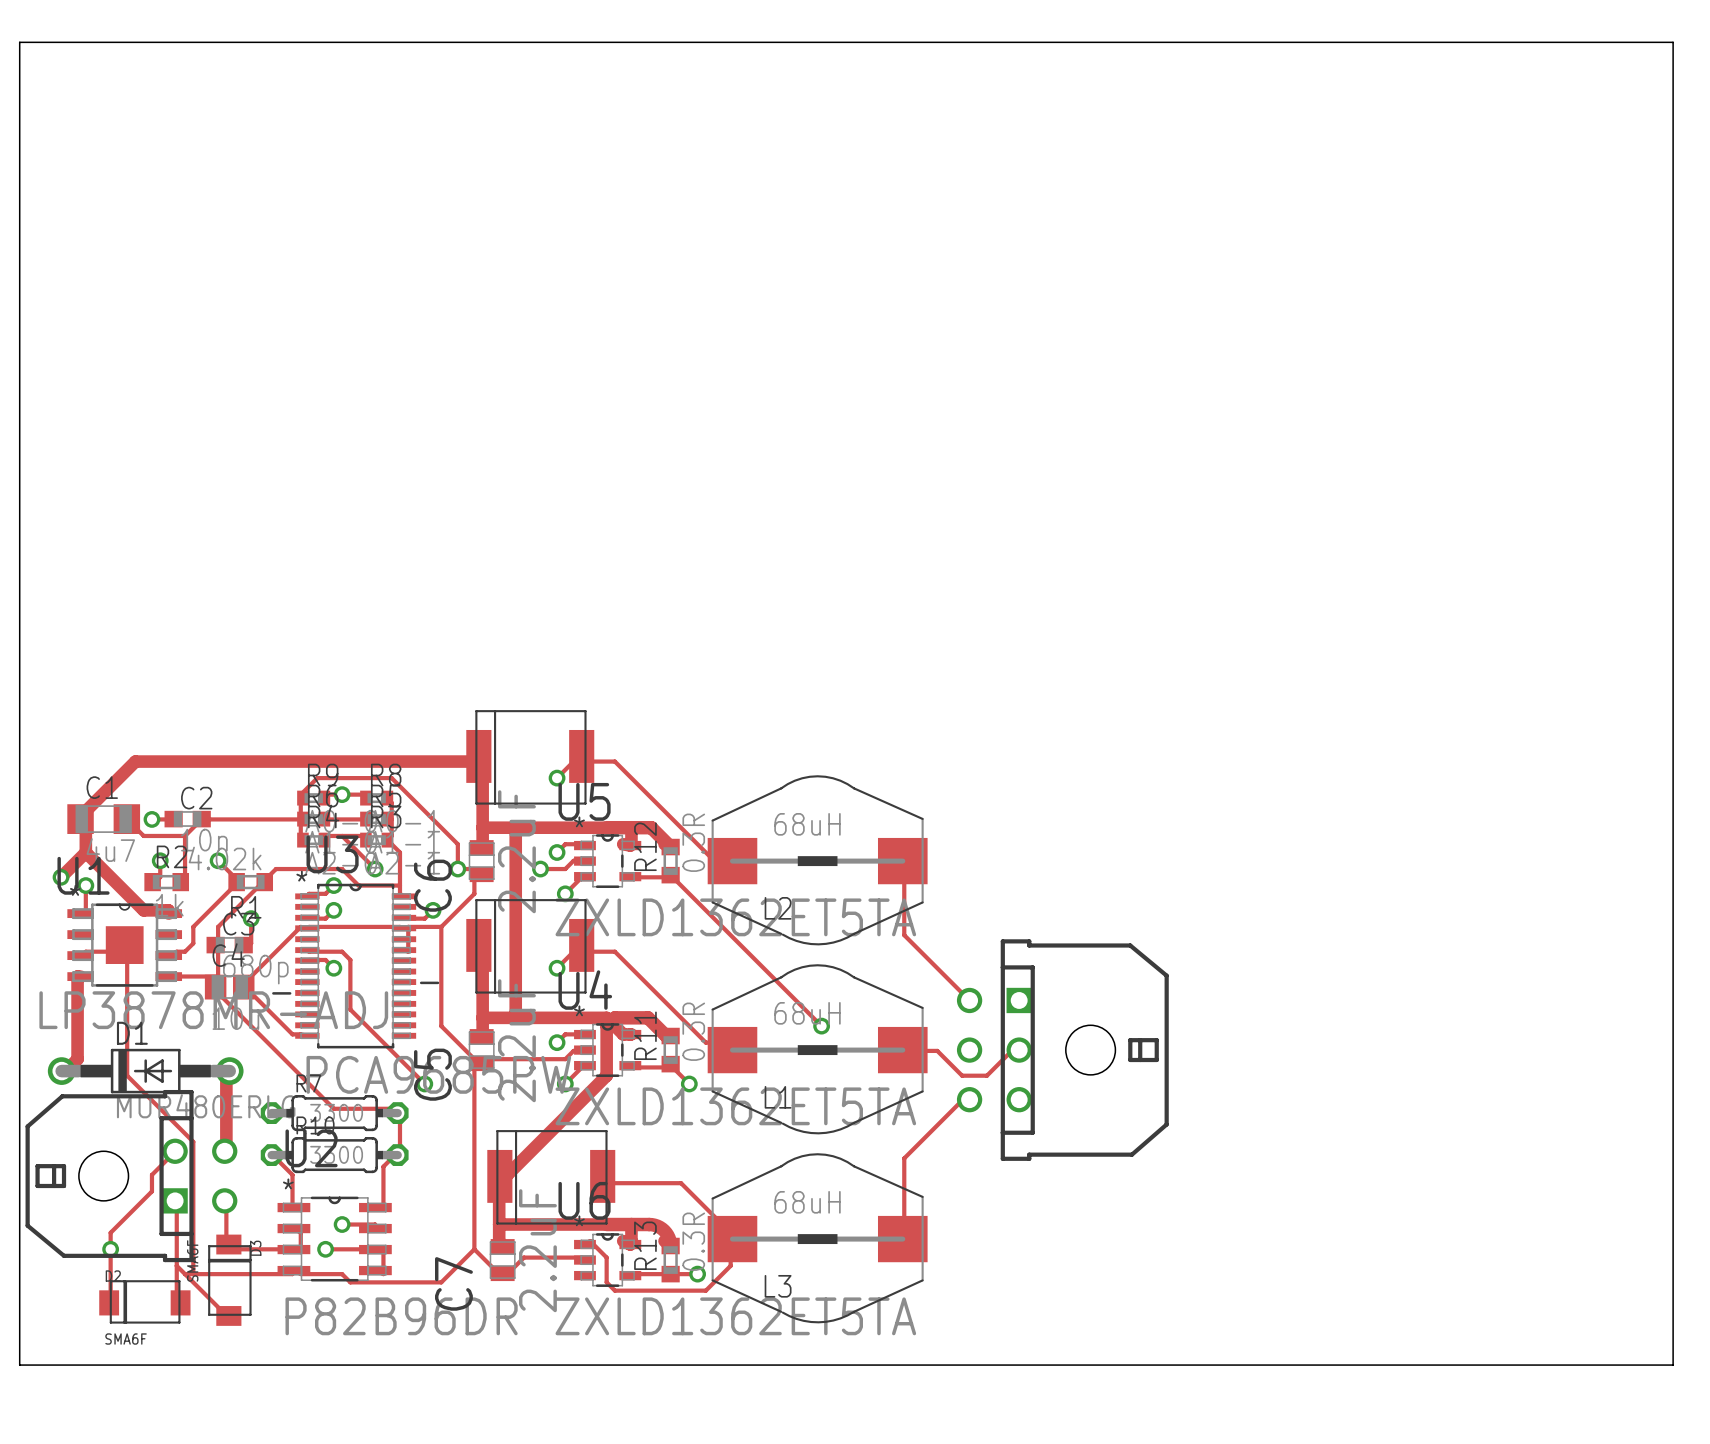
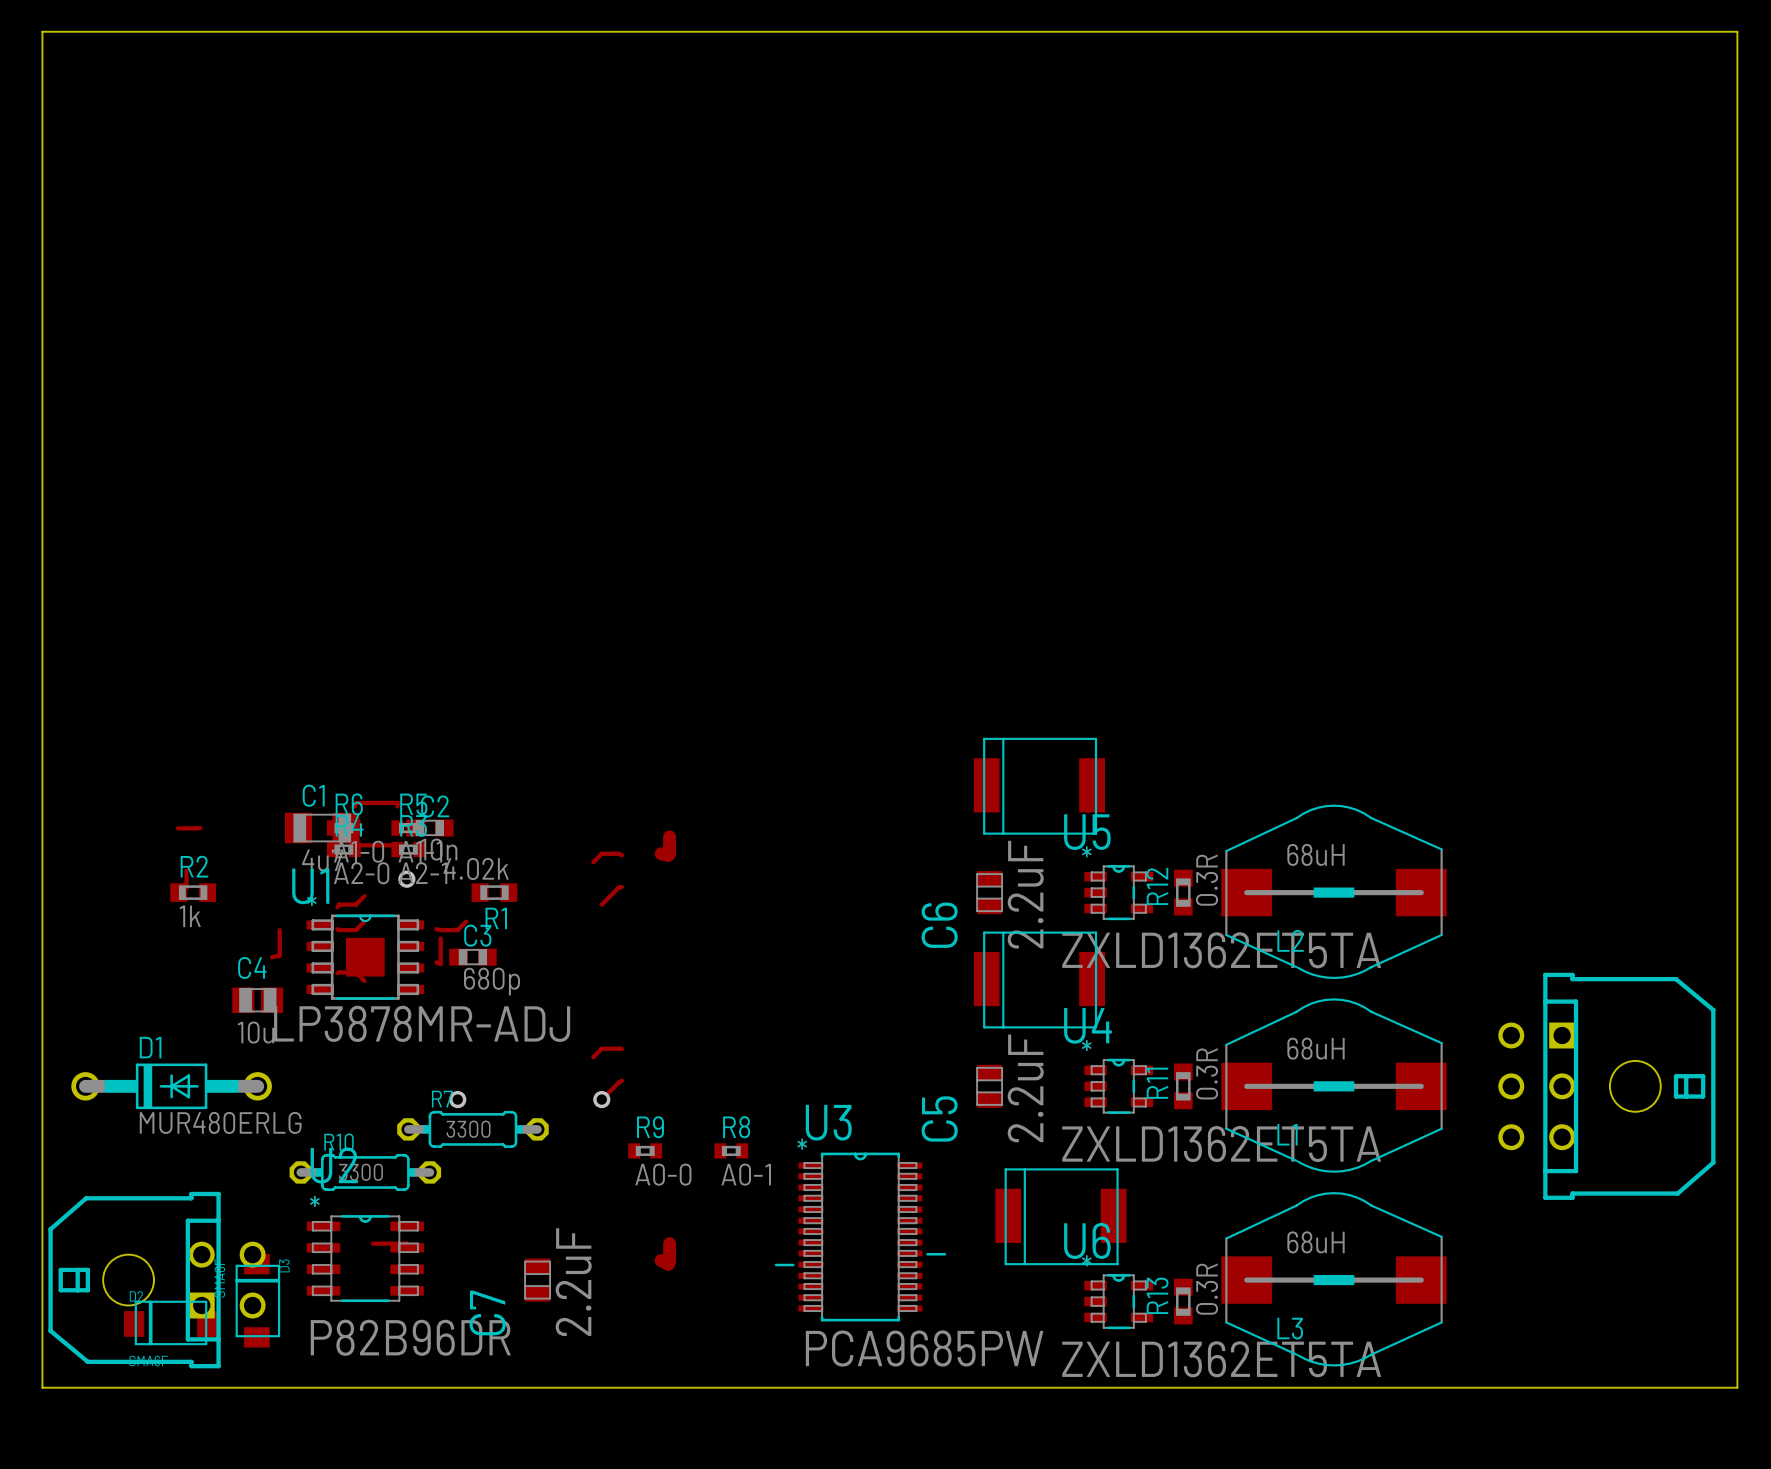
part: (530, 757) -> none
track: (557, 778) (573, 761) (581, 756) (581, 761) (614, 761) (714, 860) (732, 861) -> none
via: (557, 778) -> none
part: none -> (1039, 786)
via: (342, 794) -> none
R9 position: (313, 798) -> (645, 1150)
R8 position: (376, 798) -> (731, 1150)
track: (387, 798) (391, 802) (391, 835) (387, 840) (399, 852) (399, 893) (403, 896) -> none
C1 position: (103, 819) -> (322, 828)
track: (126, 819) (143, 835) (185, 835) -> none
via: (151, 819) -> none
C2 position: (187, 819) -> (429, 828)
track: (302, 819) (201, 819) (185, 835) -> none
track: (324, 819) (365, 819) -> none
track: (482, 827) (651, 827) (670, 847) (664, 844) -> none
track: (515, 827) (515, 1017) -> none
track: (185, 835) (185, 877) (180, 882) -> none
track: (342, 835) (375, 869) -> none
track: (302, 840) (300, 835) (300, 802) (302, 798) (300, 794) (317, 778) (391, 778) (457, 844) (457, 869) (474, 869) (481, 874) (474, 877) (474, 893) (441, 926) -> none
track: (481, 847) (482, 761) (478, 756) (474, 761) (135, 761) (85, 811) (80, 819) (85, 819) (85, 852) -> none
track: (85, 852) (143, 910) (168, 910) (168, 913) -> none
track: (85, 852) (61, 877) -> none
via: (557, 852) -> none
via: (160, 860) -> none
track: (218, 860) (234, 877) (236, 882) (193, 926) (193, 943) (185, 951) (176, 951) (168, 955) -> none
via: (218, 860) -> none
L2 position: (817, 860) -> (1334, 891)
C6 position: (481, 861) -> (989, 892)
track: (584, 861) (573, 860) (565, 869) (540, 869) -> none
U5 position: (607, 861) -> (1118, 892)
R12 position: (670, 861) -> (1183, 892)
track: (902, 861) (904, 935) (969, 1000) -> none
via: (457, 869) -> none
via: (540, 869) -> none
track: (630, 876) (664, 877) (670, 875) (821, 1026) -> none
via: (61, 877) -> none
R1 position: (250, 882) -> (494, 892)
track: (85, 885) (85, 910) (80, 913) -> none
via: (85, 885) -> none
via: (333, 885) -> none
track: (399, 885) (358, 885) (342, 869) (275, 869) (218, 926) (218, 943) (215, 945) (218, 951) (218, 984) (215, 987) -> none
via: (565, 893) -> none
via: (333, 910) -> none
via: (433, 910) -> none
via: (251, 918) -> none
track: (441, 926) (300, 926) (242, 984) (292, 1034) (307, 1035) -> none
track: (441, 926) (441, 1026) (474, 1059) (481, 1063) -> none
U1 position: (124, 945) -> (365, 957)
C3 position: (229, 945) -> (472, 957)
track: (478, 945) (482, 951) (481, 1036) -> none
part: (530, 946) -> none
track: (307, 950) (342, 951) (350, 959) (350, 1009) (424, 1083) -> none
track: (80, 955) (85, 951) (118, 951) (124, 945) (127, 951) (127, 1075) (193, 1141) (193, 1274) -> none
U3 position: (355, 966) -> (860, 1237)
part: none -> (1039, 979)
via: (333, 968) -> none
track: (557, 968) (581, 945) (581, 951) (614, 951) (705, 1042) (730, 1042) (732, 1050) -> none
via: (557, 968) -> none
track: (80, 976) (77, 976) (77, 1059) (69, 1067) (61, 1071) -> none
track: (168, 976) (218, 976) (215, 987) -> none
track: (215, 987) (218, 993) (333, 1108) (391, 1108) (397, 1113) (399, 1117) (399, 1150) (397, 1155) (383, 1166) (383, 1207) (375, 1207) -> none
track: (482, 1017) (606, 1017) (623, 1034) (631, 1034) -> none
via: (821, 1026) -> none
track: (664, 1034) (670, 1036) (666, 1036) (647, 1017) (614, 1017) (606, 1026) (606, 1075) (507, 1174) (499, 1176) (499, 1241) (502, 1246) -> none
via: (557, 1042) -> none
L1 position: (817, 1049) -> (1334, 1085)
C5 position: (481, 1050) -> (989, 1086)
track: (584, 1050) (573, 1050) (565, 1059) (482, 1059) (481, 1063) -> none
U4 position: (607, 1050) -> (1118, 1086)
R11 position: (670, 1050) -> (1183, 1086)
track: (902, 1050) (937, 1050) (962, 1075) (986, 1075) (1011, 1050) (1019, 1050) -> none
part: (1062, 1050) -> none
track: (481, 1063) (474, 1067) (474, 1249) -> none
track: (630, 1065) (631, 1067) (664, 1067) (670, 1064) (689, 1083) -> none
track: (229, 1071) (226, 1075) (226, 1150) (224, 1151) -> none
part: none -> (1606, 1086)
via: (689, 1083) -> none
track: (969, 1099) (962, 1100) (904, 1158) (902, 1239) -> none
R7 position: (334, 1113) -> (472, 1129)
track: (175, 1151) (151, 1174) (151, 1191) (110, 1232) (109, 1302) -> none
track: (271, 1155) (292, 1174) (293, 1207) -> none
part position: (131, 1176) -> (157, 1280)
track: (602, 1176) (606, 1183) (681, 1183) (730, 1232) (732, 1239) (730, 1241) (730, 1265) (705, 1290) (614, 1290) (606, 1282) (606, 1257) (590, 1241) (584, 1244) -> none
part: (551, 1177) -> none
part: none -> (1060, 1216)
track: (175, 1200) (176, 1207) (176, 1298) (180, 1302) -> none
track: (224, 1200) (226, 1241) (234, 1249) (300, 1249) (300, 1232) (293, 1228) -> none
via: (342, 1224) -> none
track: (499, 1224) (651, 1224) (664, 1230) (669, 1237) (670, 1246) (664, 1241) -> none
L3 position: (817, 1238) -> (1334, 1279)
via: (110, 1249) -> none
track: (325, 1249) (383, 1249) (383, 1274) (375, 1270) -> none
via: (325, 1249) -> none
track: (474, 1249) (499, 1274) (507, 1274) (523, 1257) (581, 1257) (584, 1260) -> none
track: (474, 1249) (441, 1282) (350, 1282) (342, 1274) (300, 1274) (293, 1270) (292, 1274) (185, 1274) -> none
U6 position: (607, 1260) -> (1118, 1301)
R13 position: (670, 1260) -> (1183, 1301)
track: (176, 1265) (228, 1315) -> none
track: (697, 1274) (630, 1275) -> none
via: (697, 1274) -> none

